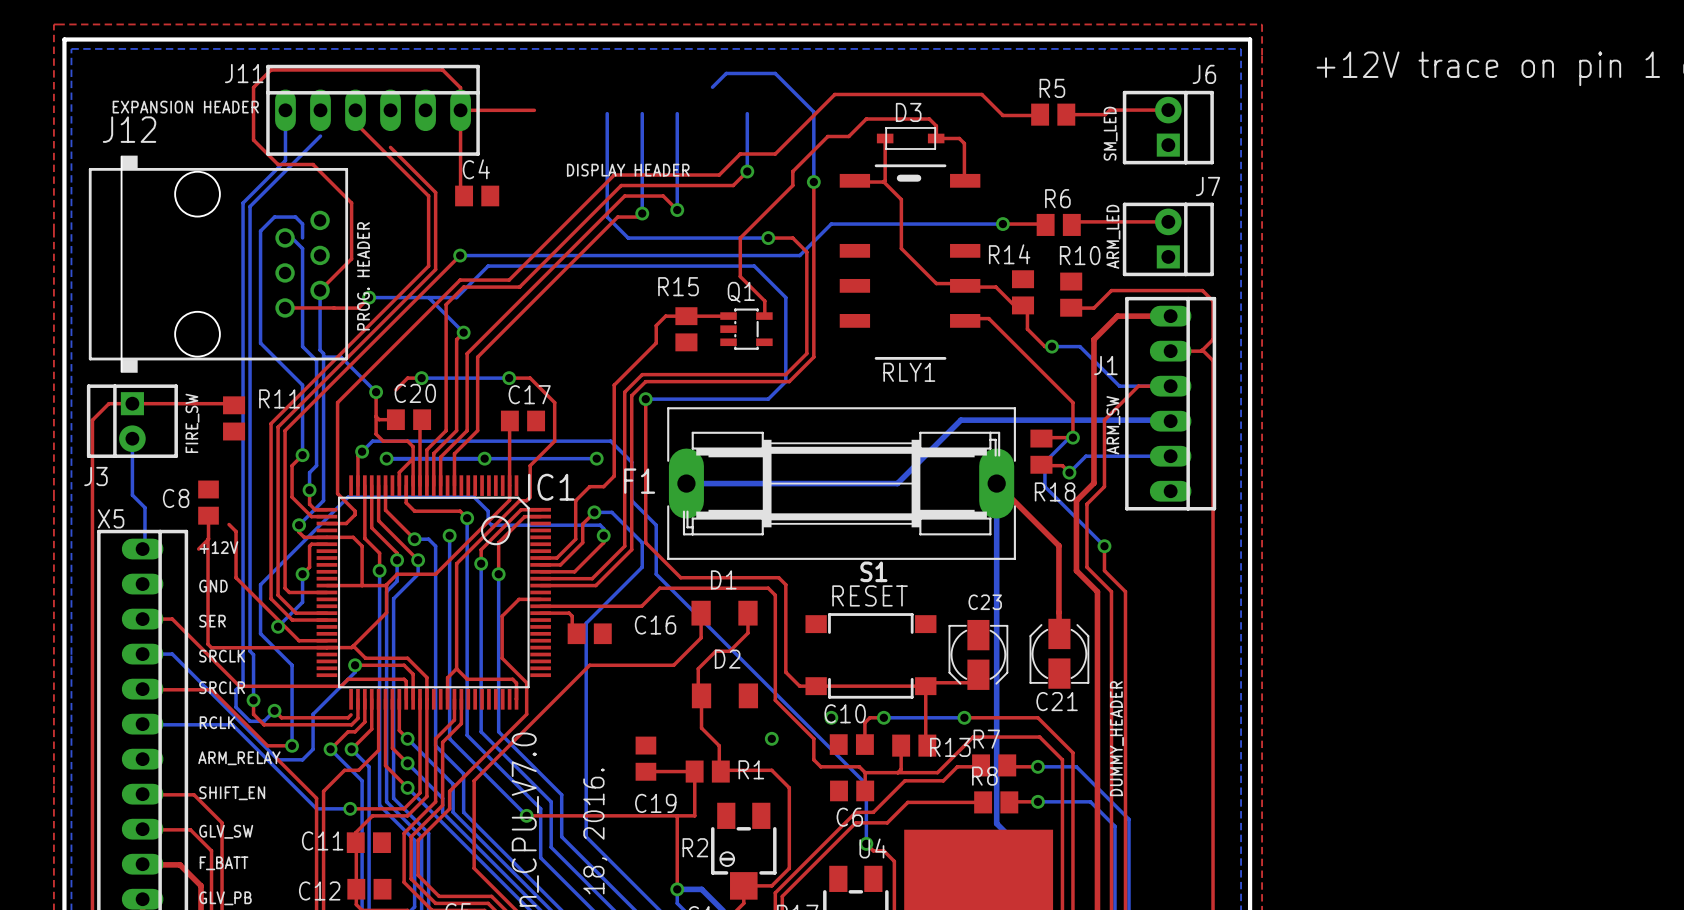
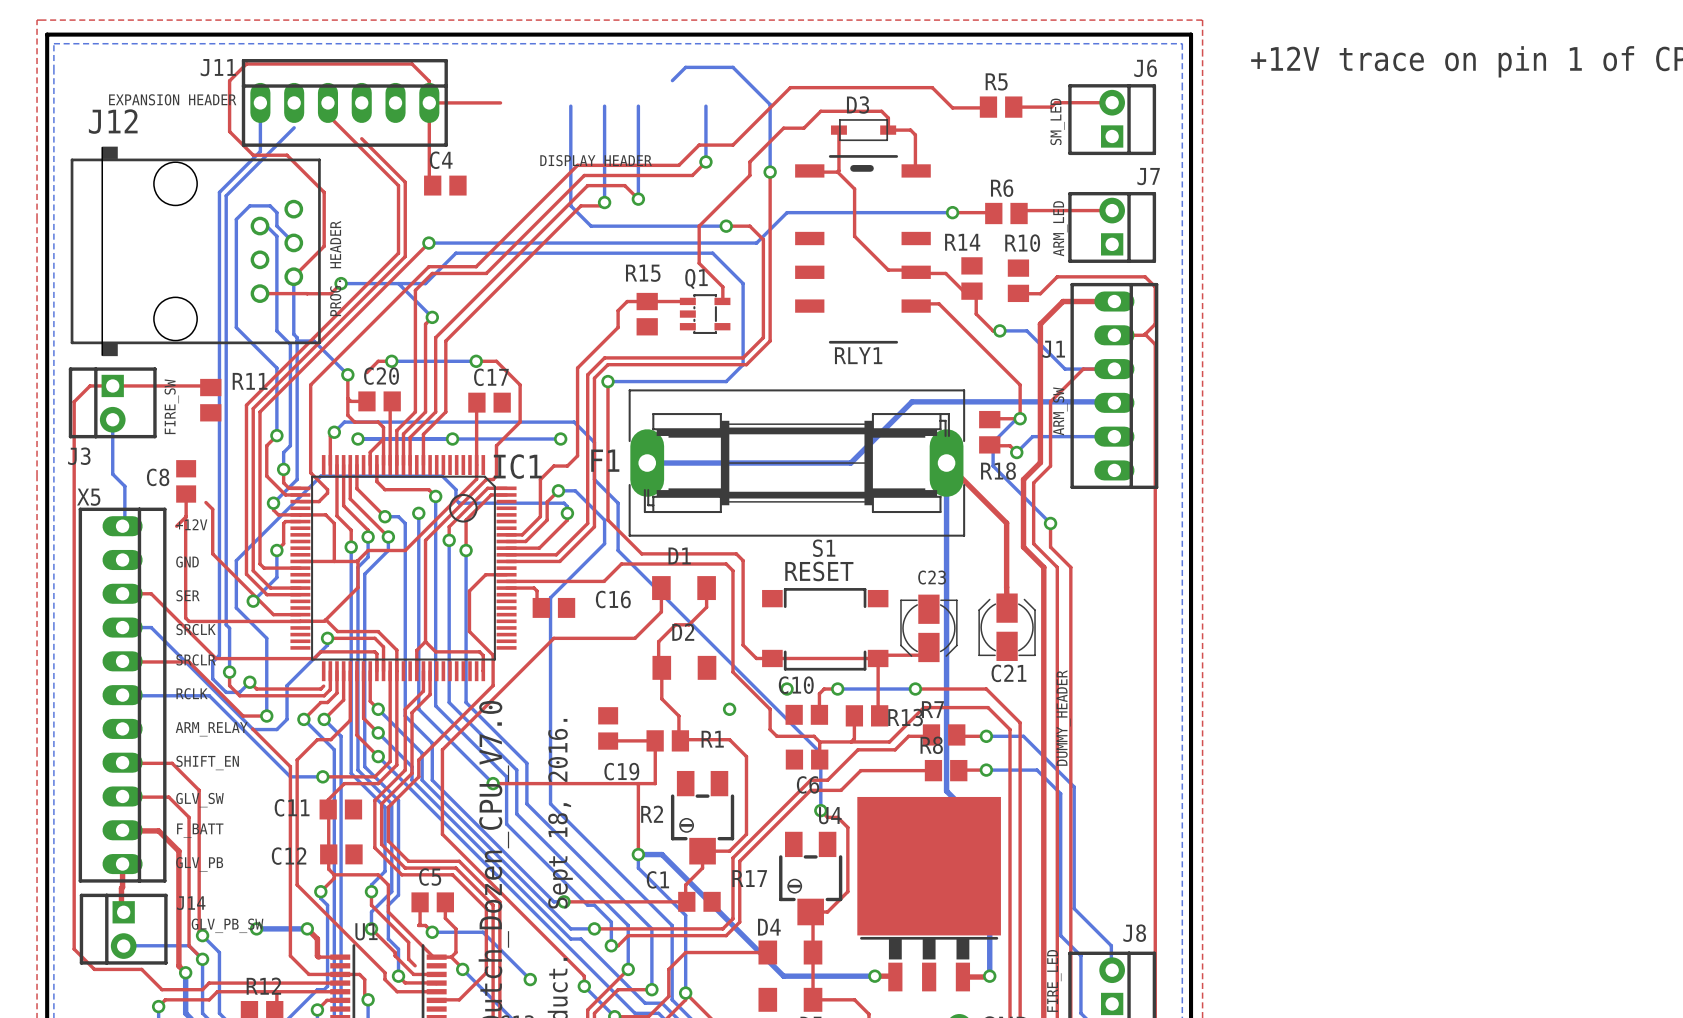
bottom track: none -> (276, 226) (293, 242)

